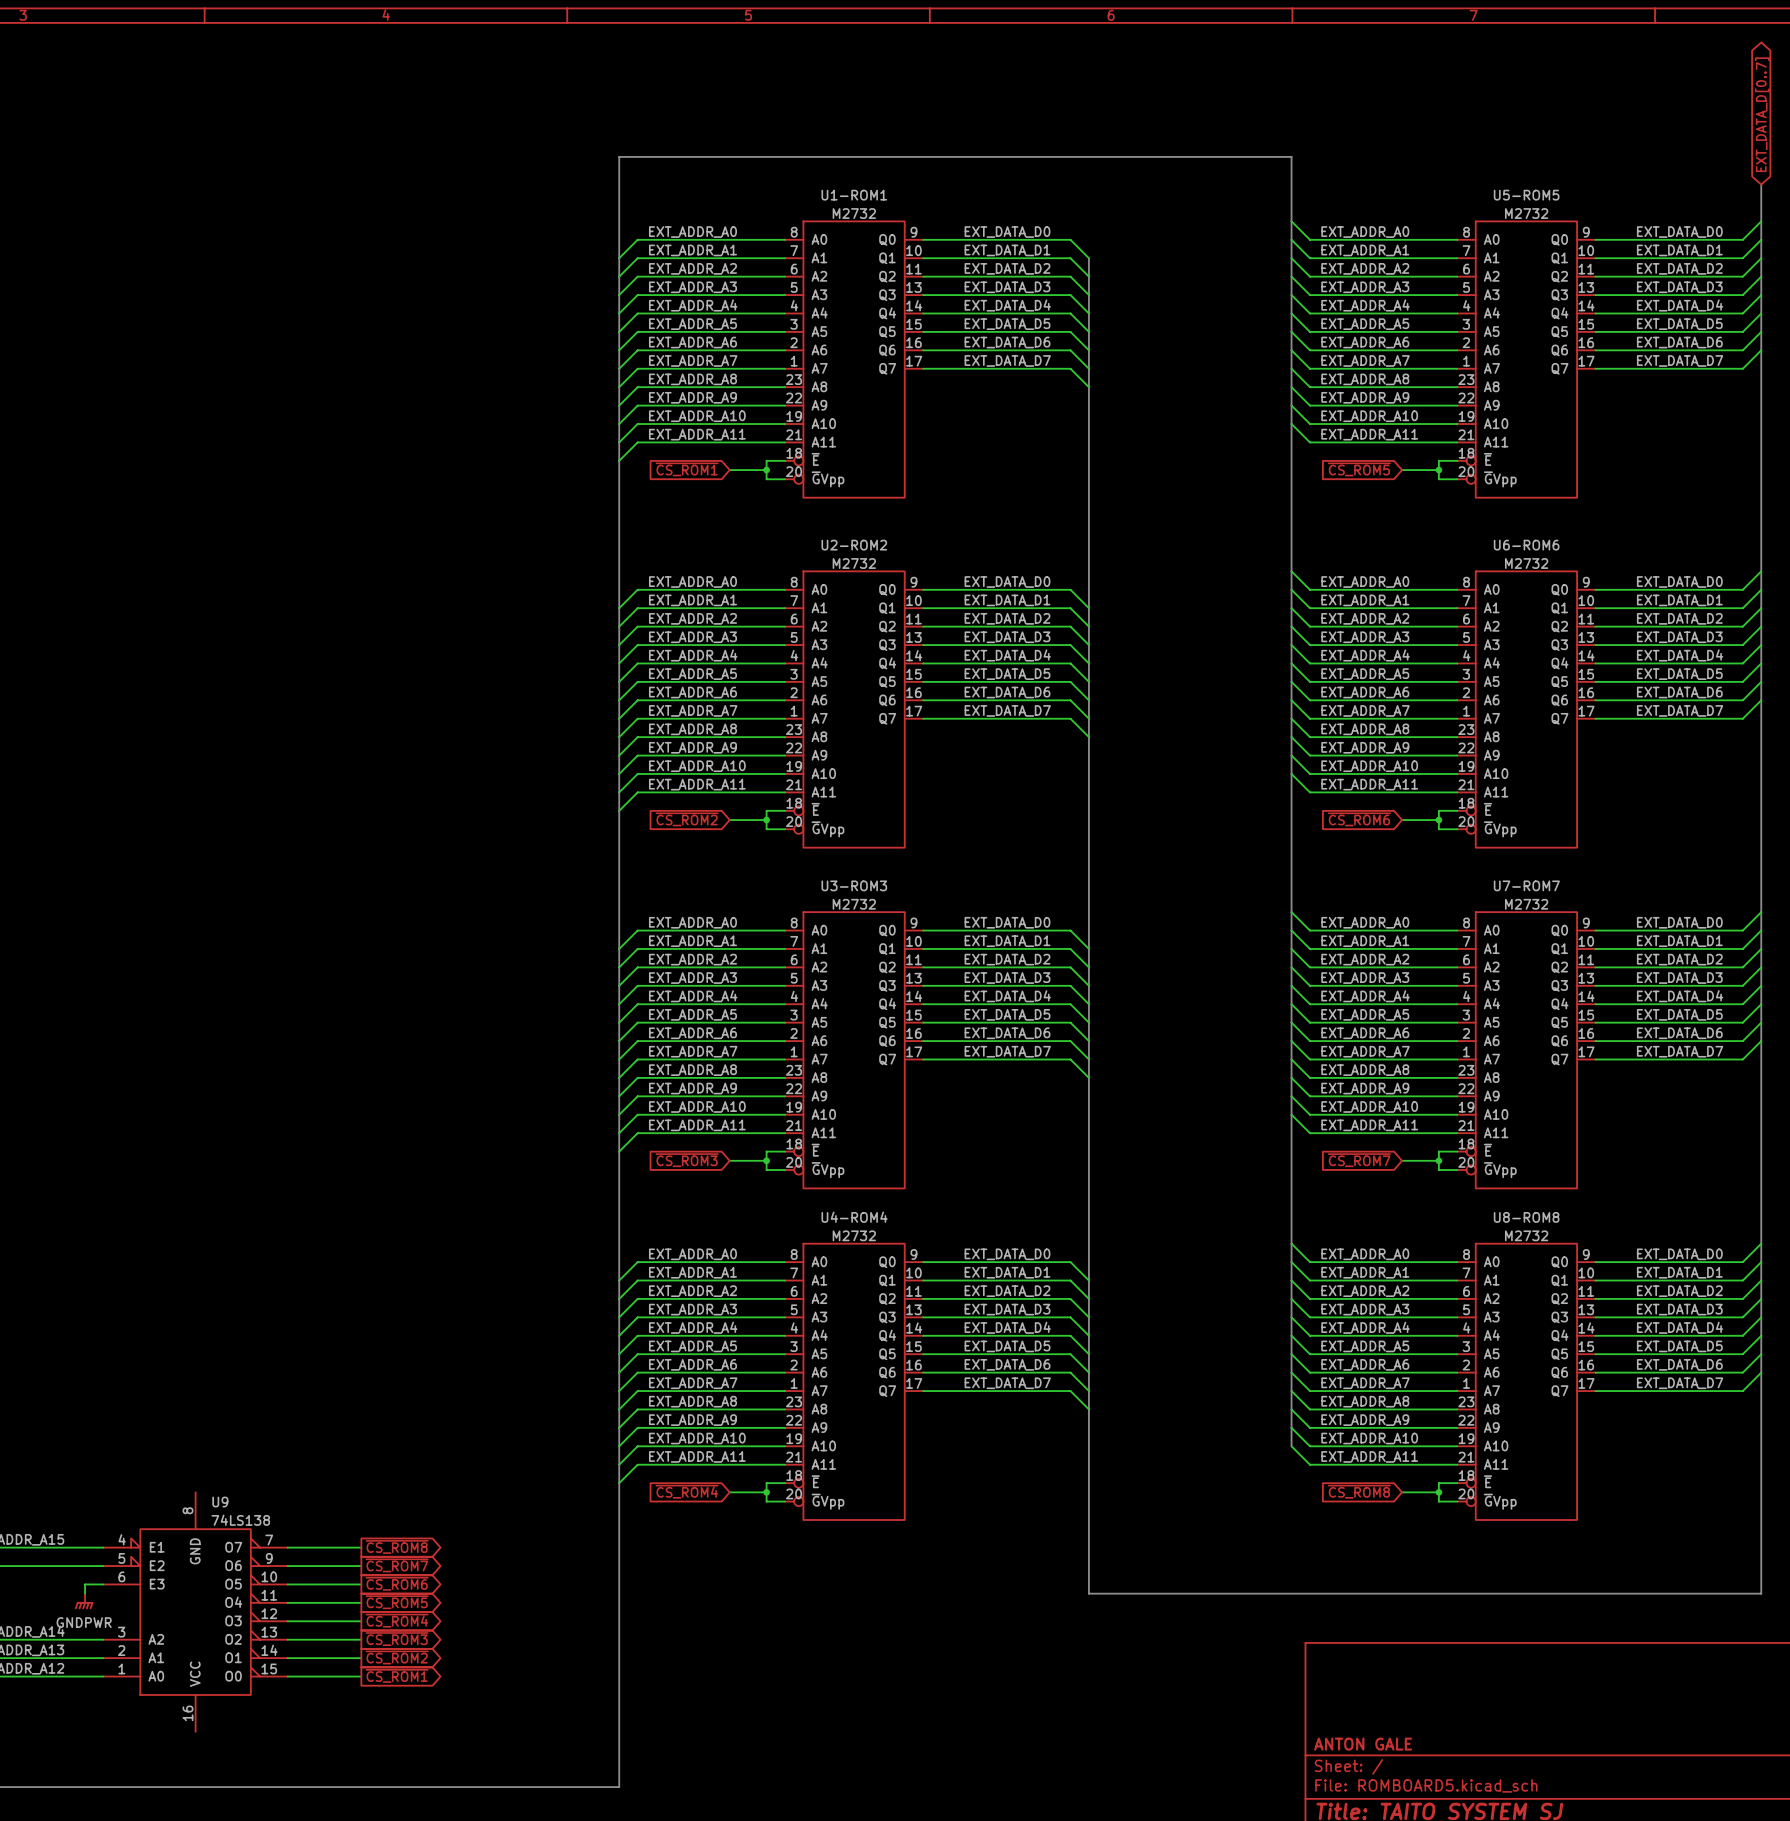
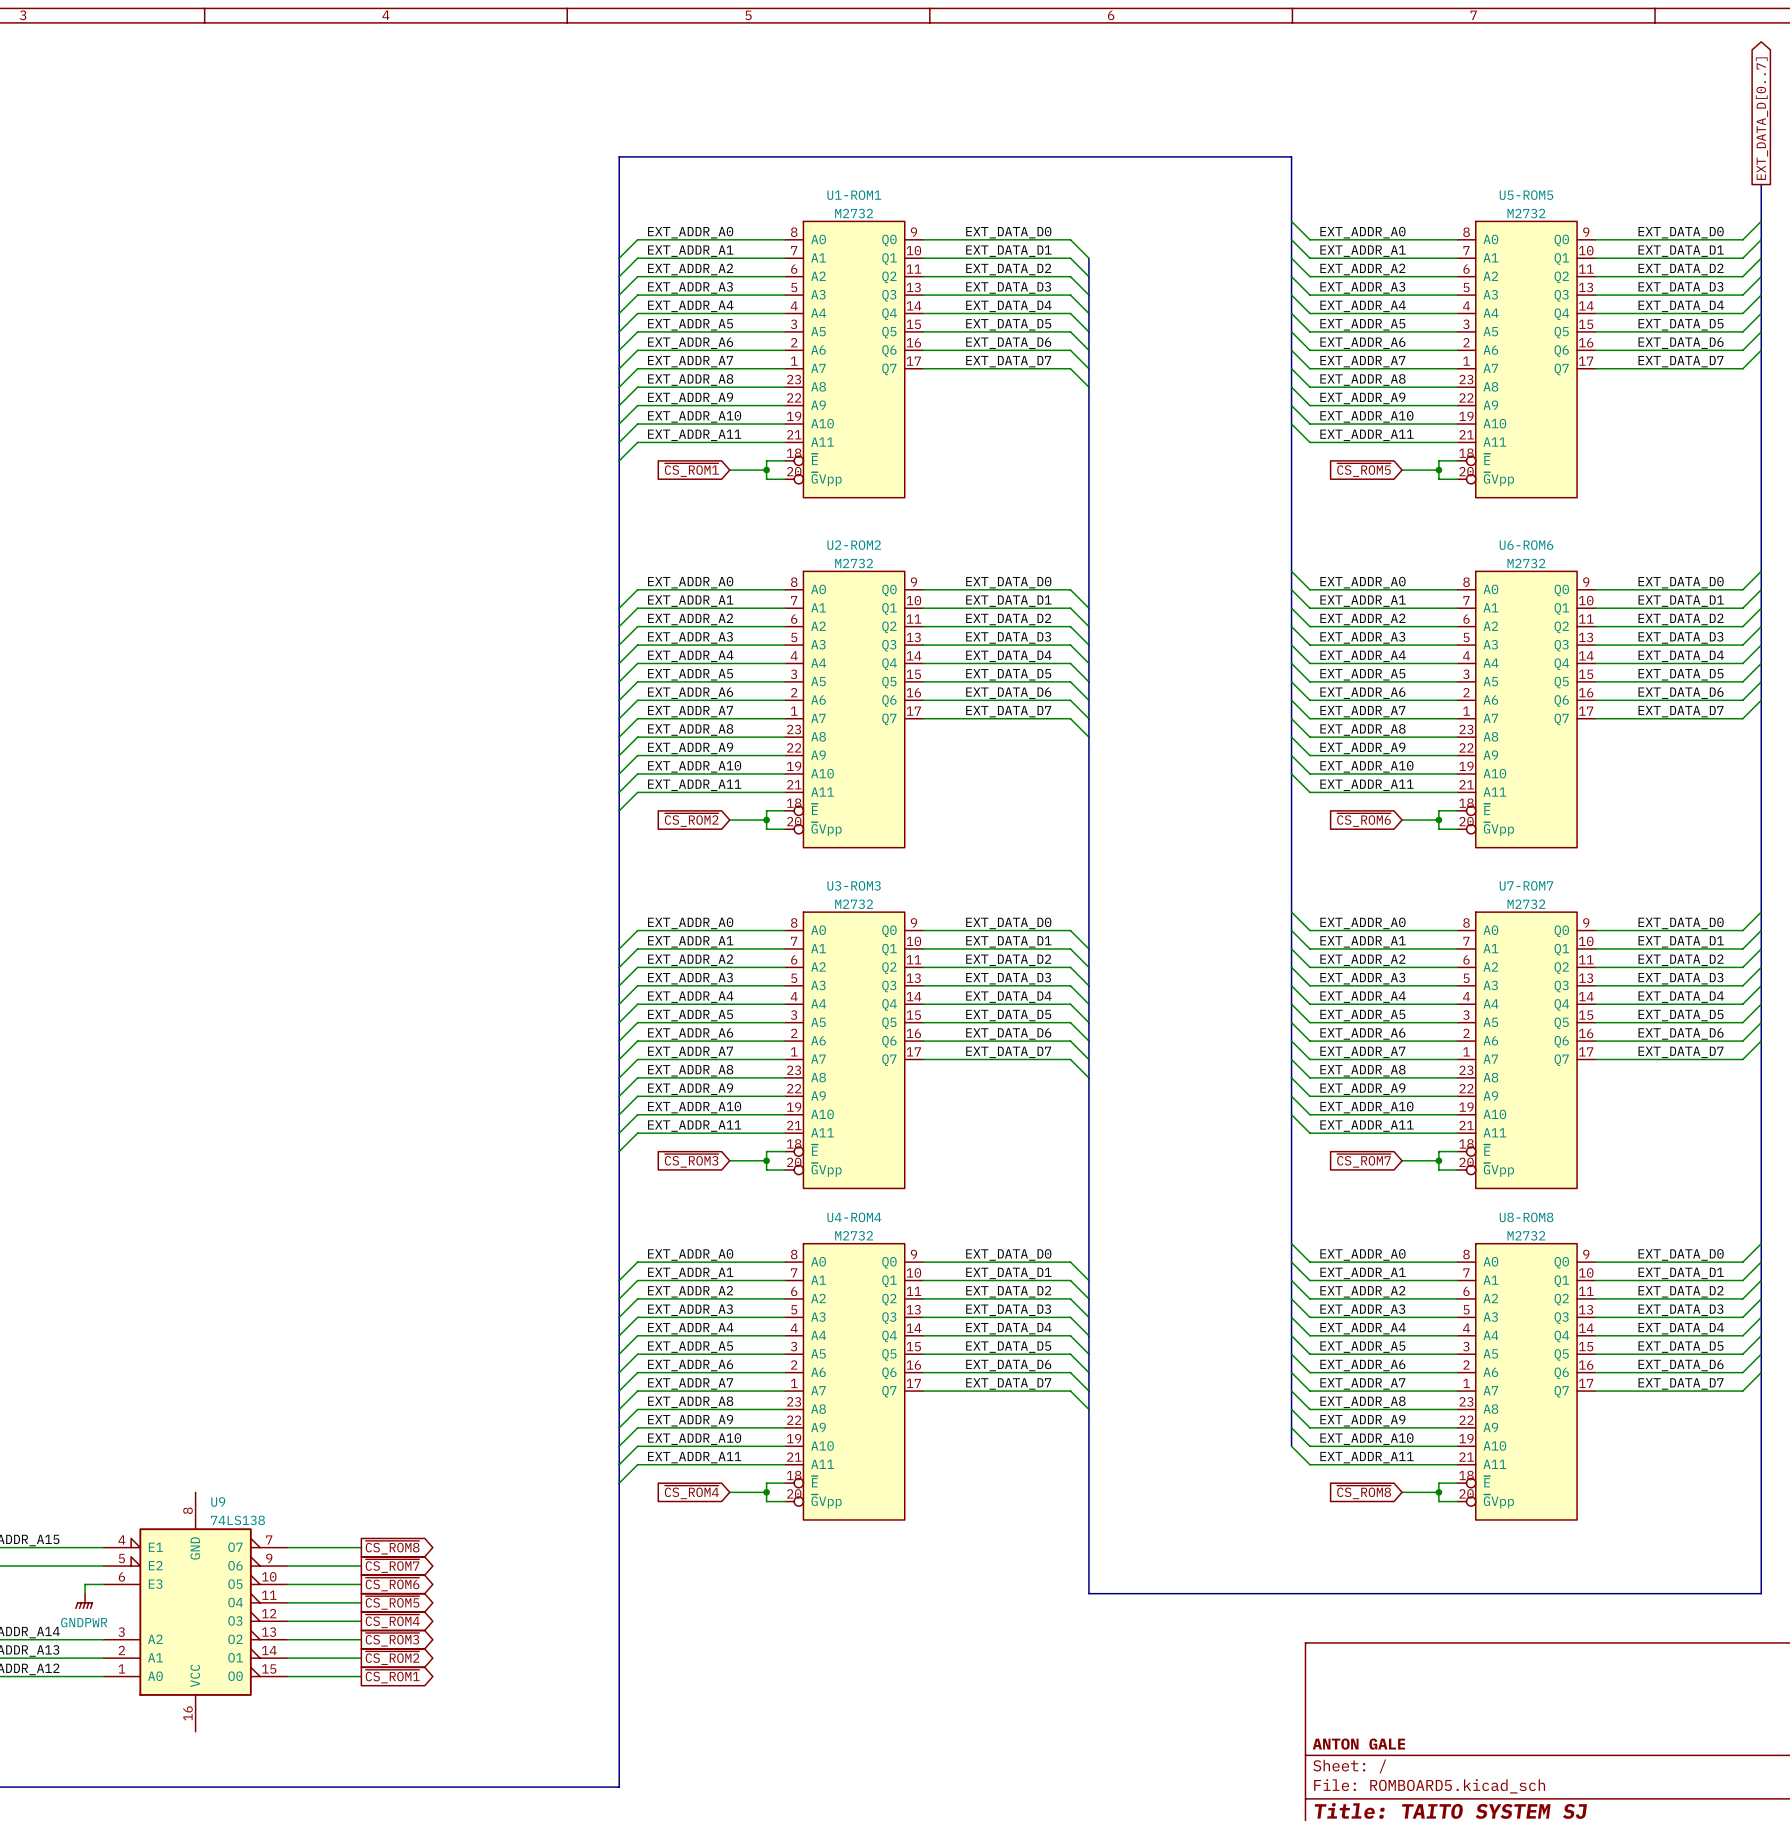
global label shape: bidirectional (1762, 114) -> output (1761, 118)

